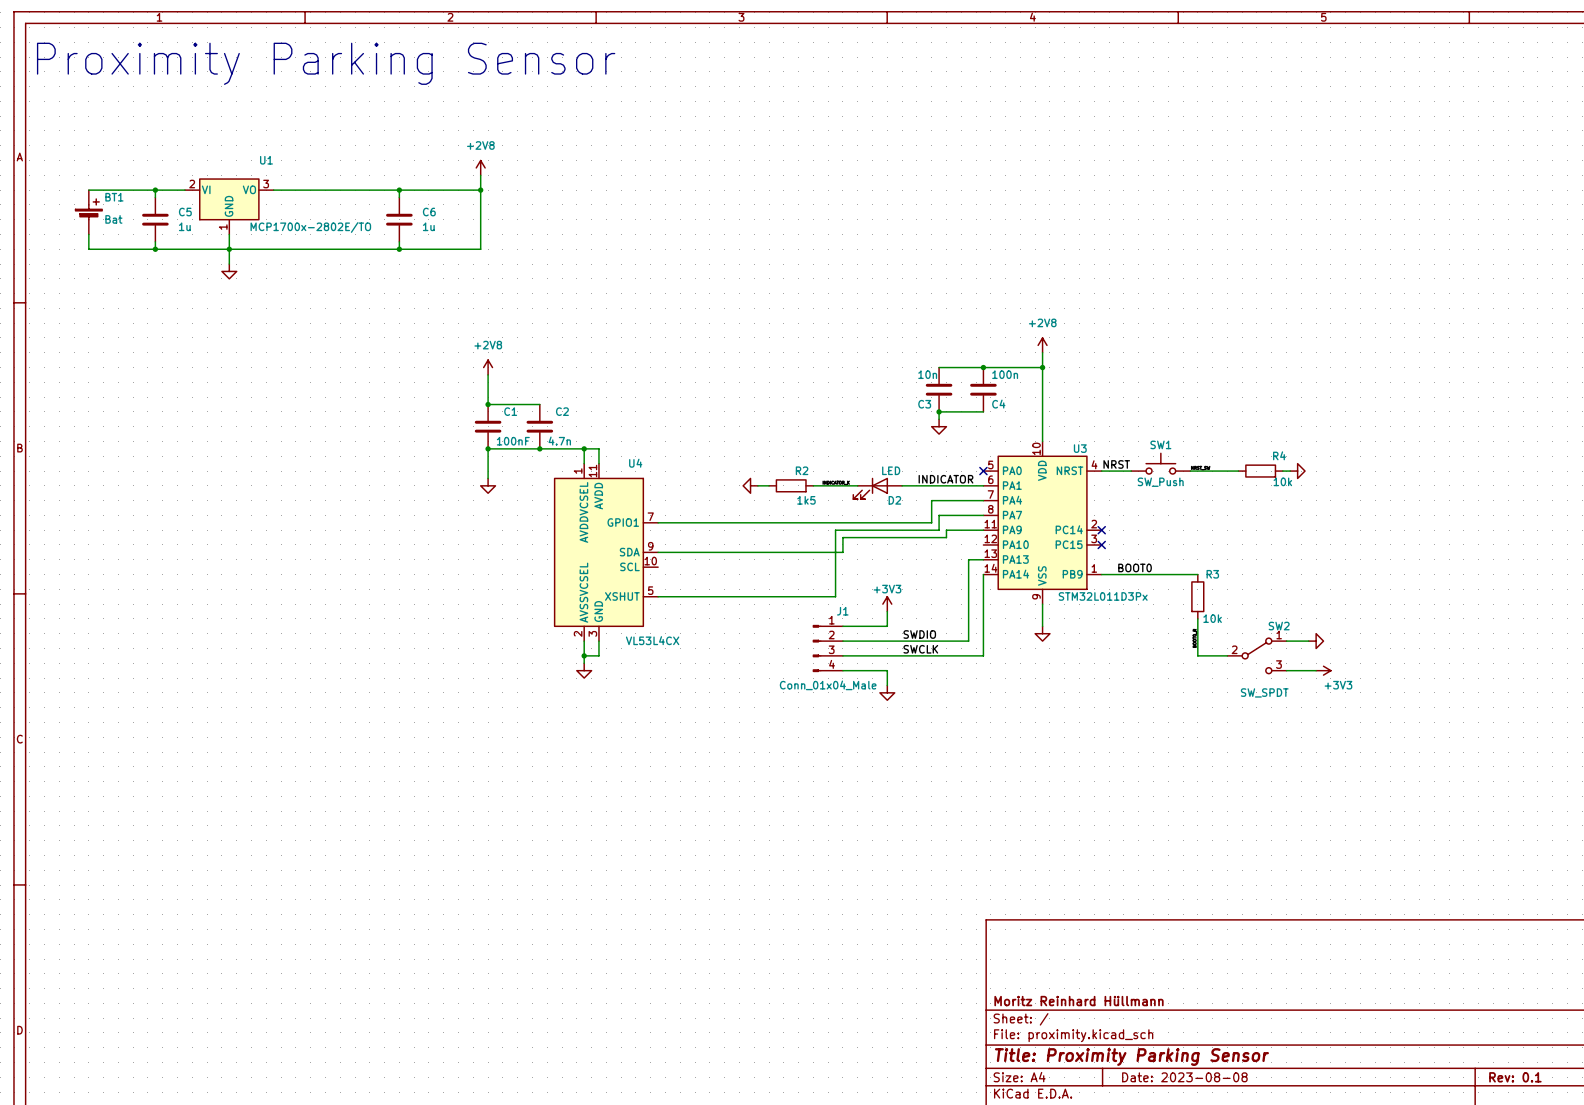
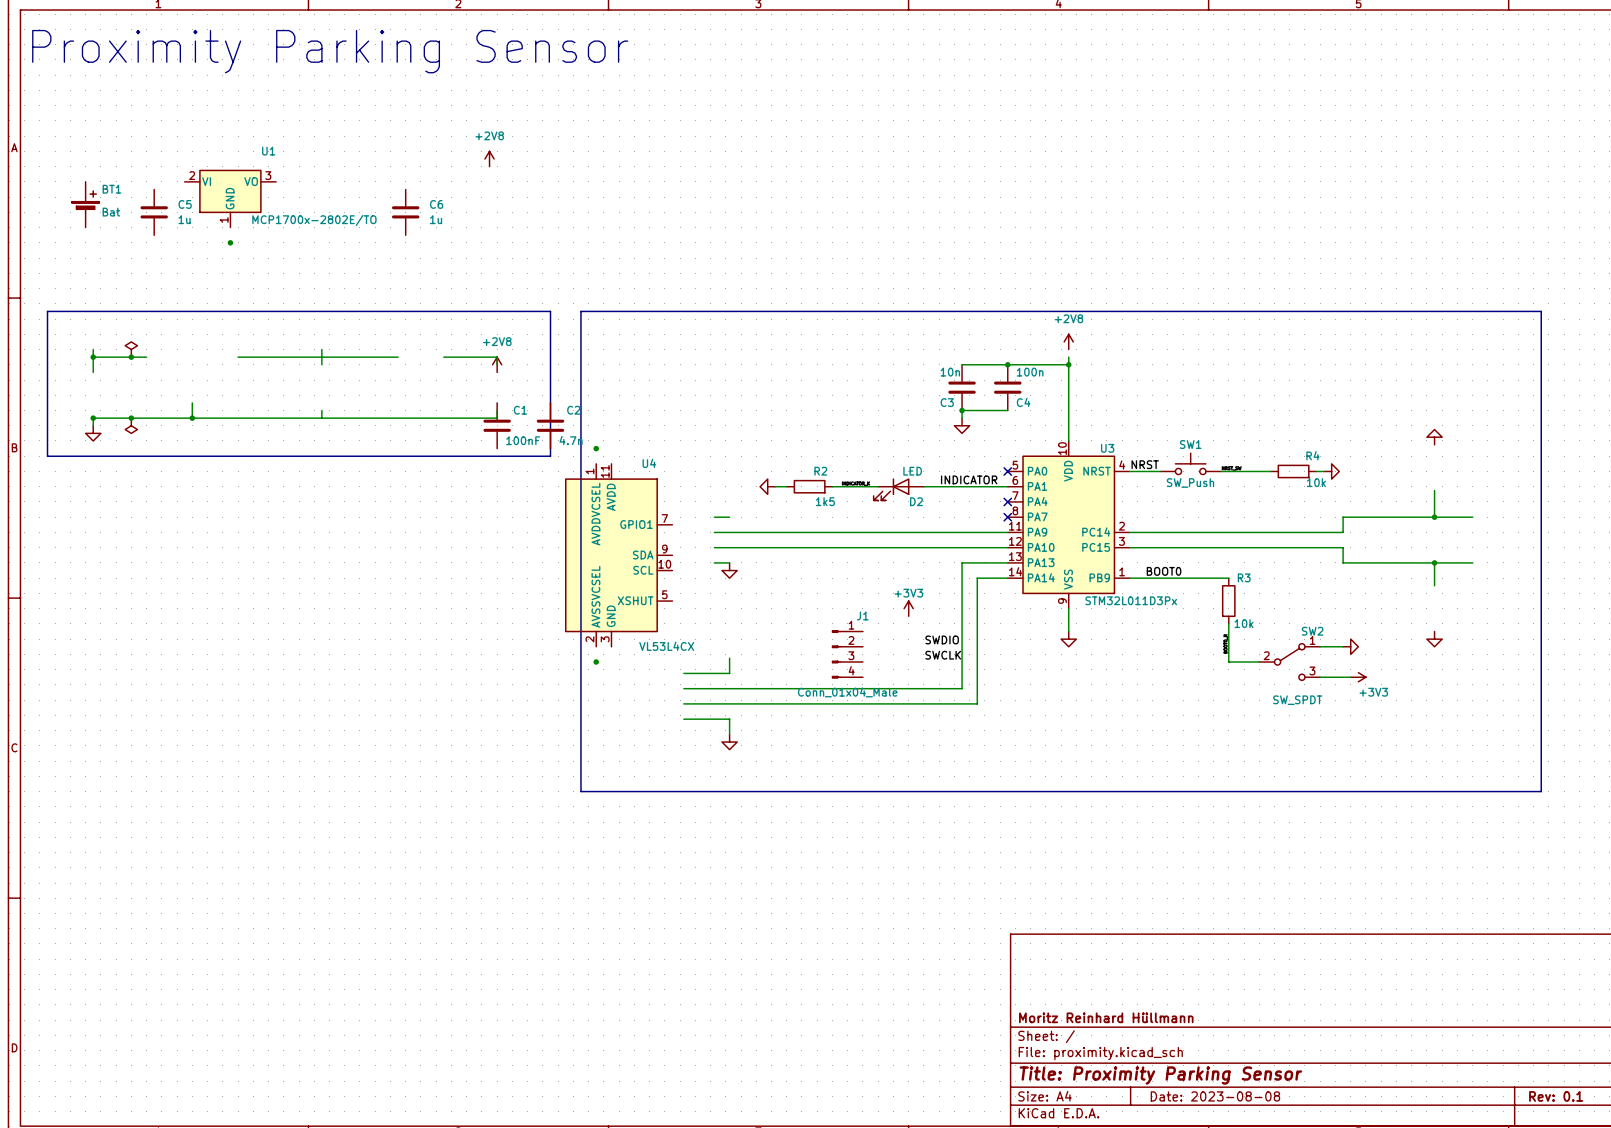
wire: (480, 175) (480, 249) (88, 249) (88, 234) -> none
wire: (88, 190) (184, 190) -> none
wire: (155, 190) (155, 197) -> none
junction: (155, 190) -> none
wire: (273, 190) (480, 190) -> none
wire: (399, 190) (399, 197) -> none
junction: (399, 190) -> none
junction: (480, 190) -> none
wire: (229, 234) (229, 264) -> none
wire: (155, 241) (155, 249) -> none
wire: (399, 241) (399, 249) -> none
junction: (155, 249) -> none
junction: (399, 249) -> none
power symbol: (229, 271) -> none
line: none -> (47, 311) (47, 456) (550, 456) (550, 311) (47, 311)
line: none -> (580, 311) (1541, 311) (1541, 791) (580, 791) (580, 311)
wire: none -> (93, 349) (93, 372)
power symbol: none -> (131, 349)
wire: none -> (321, 349) (321, 364)
wire: (1042, 352) (1042, 360) -> none
wire: none -> (93, 357) (146, 357)
junction: none -> (93, 357)
junction: none -> (131, 357)
wire: none -> (238, 357) (398, 357)
wire: none -> (443, 357) (497, 357) (497, 364)
wire: (488, 374) (488, 404) (539, 404) -> none
wire: none -> (192, 402) (192, 418)
junction: (488, 404) -> none
wire: none -> (321, 410) (321, 418)
wire: none -> (497, 410) (497, 418) (93, 418) (93, 425)
junction: none -> (93, 418)
junction: none -> (131, 418)
junction: none -> (192, 418)
power symbol: none -> (131, 425)
power symbol: none -> (93, 433)
power symbol: none -> (1434, 437)
junction: (488, 448) -> none
junction: (539, 448) -> none
wire: (584, 448) (584, 463) -> none
wire: (598, 463) (598, 448) (488, 448) (488, 478) -> none
power symbol: (488, 485) -> none
wire: none -> (1434, 490) (1434, 517)
wire: (983, 500) (931, 500) (931, 522) (658, 522) -> none
no-connect mark: none -> (1007, 501)
wire: none -> (714, 517) (729, 517)
wire: (983, 515) (939, 515) (939, 530) -> (969, 532) (962, 532)
no-connect mark: none -> (1007, 517)
junction: none -> (1434, 517)
wire: none -> (1472, 517) (1343, 517) (1343, 532) (1129, 532)
wire: (835, 530) (835, 596) (658, 596) -> (855, 532) (714, 532)
wire: (946, 530) (946, 537) (842, 537) (842, 552) (658, 552) -> none
no-connect mark: (1101, 530) -> none
wire: none -> (714, 547) (1007, 547)
wire: none -> (1129, 547) (1343, 547) (1343, 562) (1472, 562)
no-connect mark: (1101, 544) -> none
wire: none -> (714, 562) (729, 562)
wire: (968, 559) (968, 641) (842, 641) -> (992, 562) (962, 562) (962, 688) (683, 688)
wire: none -> (1434, 562) (1434, 585)
junction: none -> (1434, 562)
power symbol: none -> (729, 570)
wire: (983, 574) (983, 655) (842, 655) -> (1007, 578) (977, 578) (977, 703) (683, 703)
wire: (887, 611) (887, 626) (842, 626) -> none
power symbol: none -> (1434, 639)
wire: (584, 641) (584, 663) -> none
wire: (598, 641) (598, 655) (584, 655) -> none
wire: none -> (729, 658) (729, 673) (683, 673)
power symbol: (584, 670) -> none
wire: (842, 670) (887, 670) (887, 685) -> none
power symbol: (887, 692) -> none
wire: none -> (683, 719) (729, 719) (729, 734)
power symbol: none -> (729, 742)

